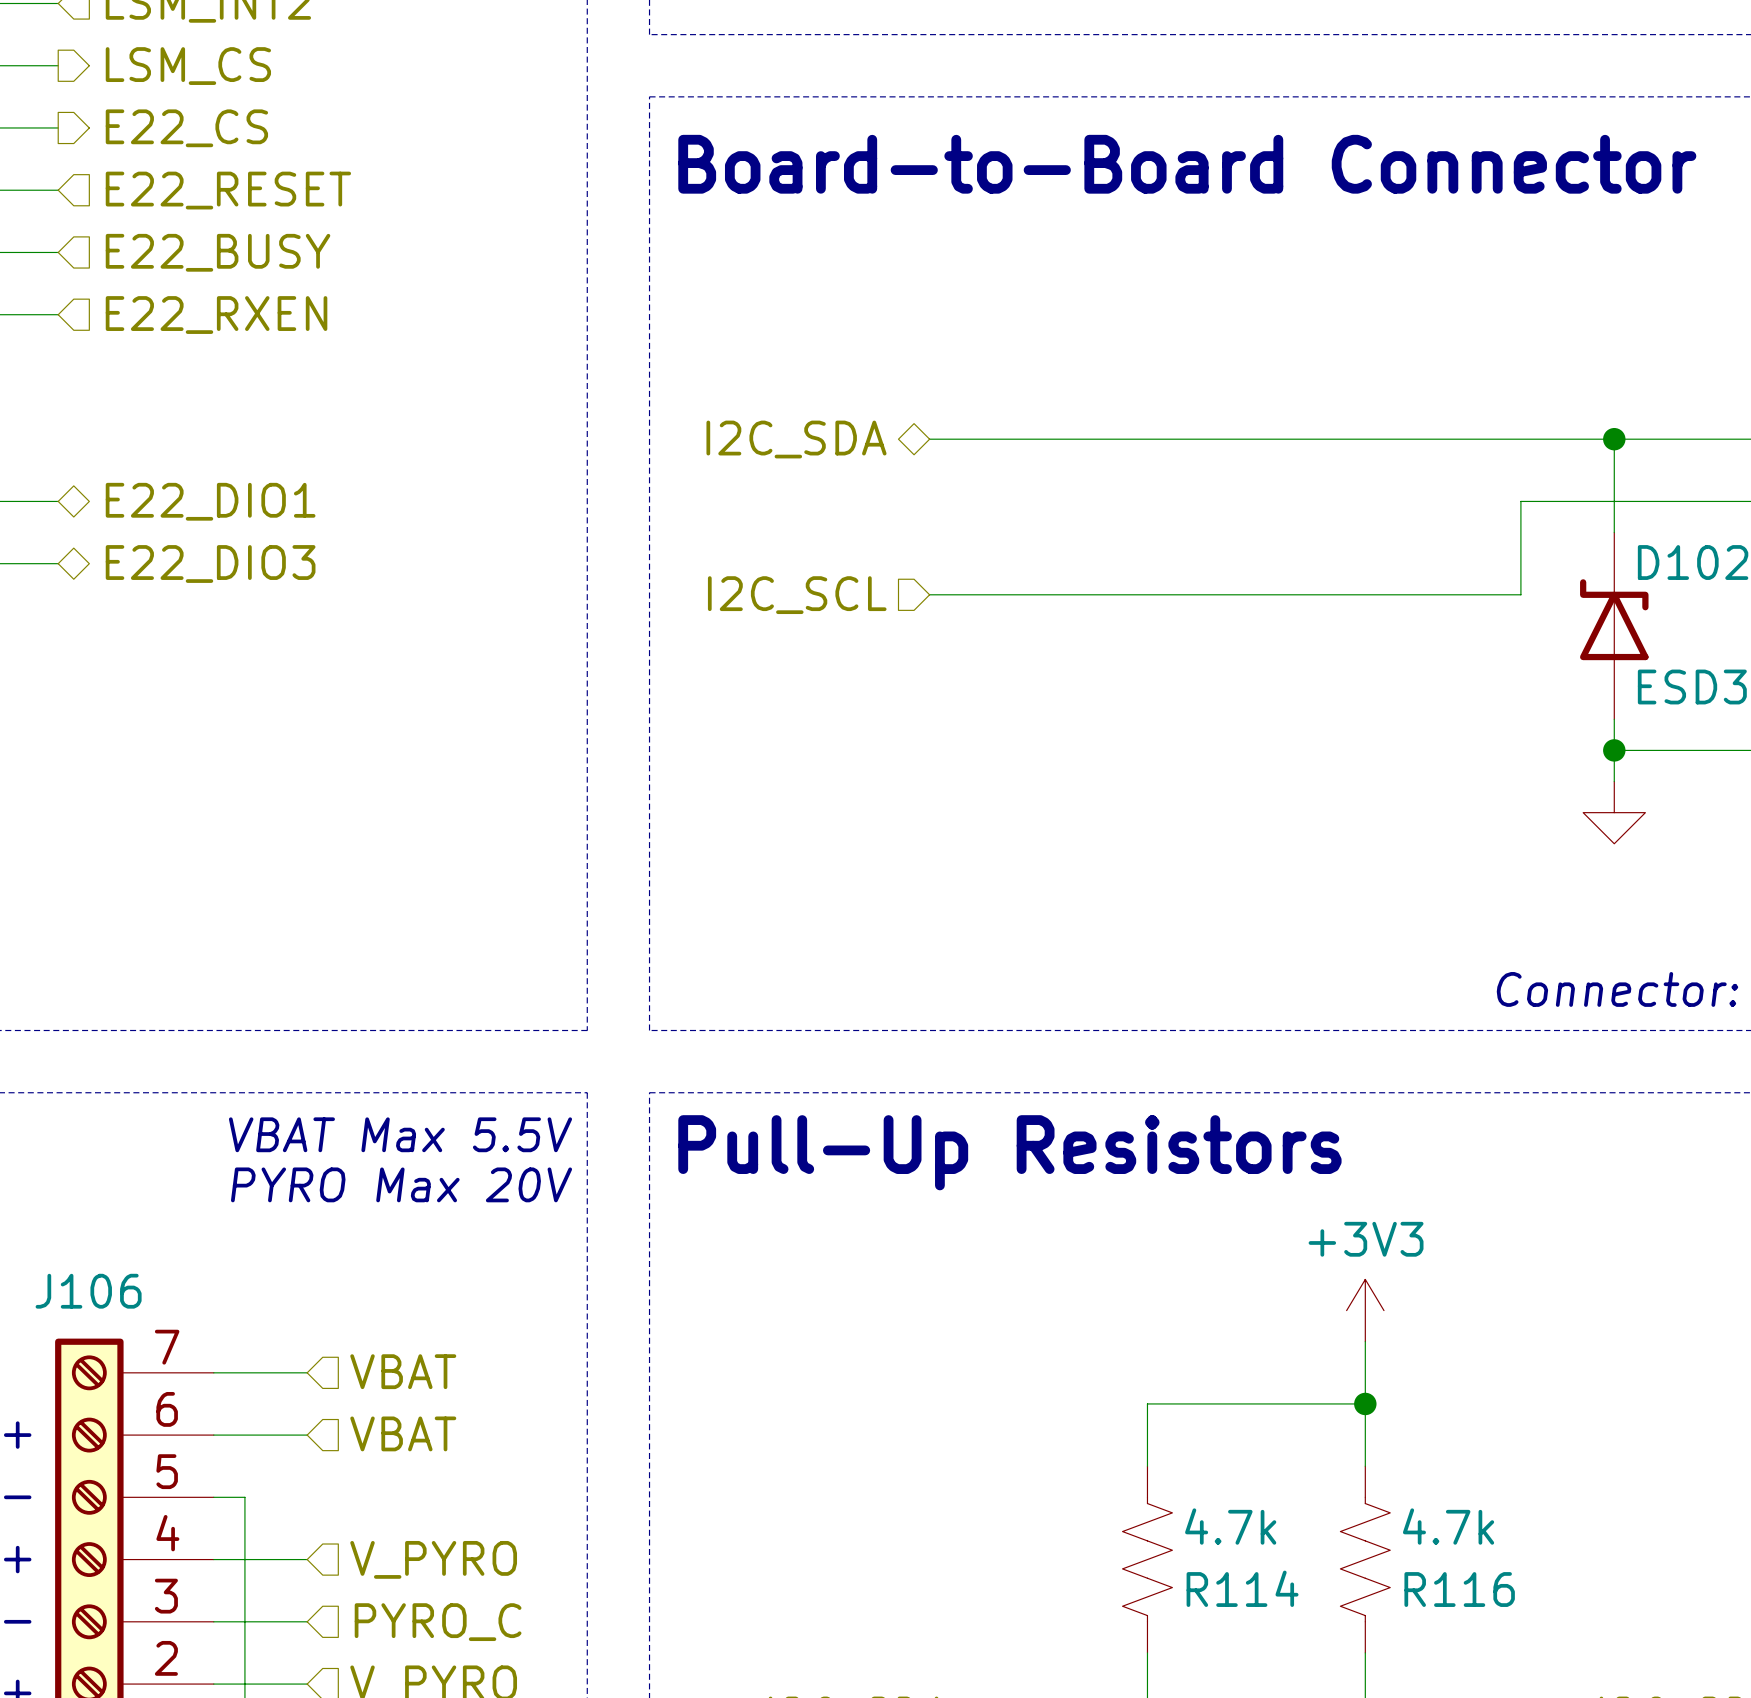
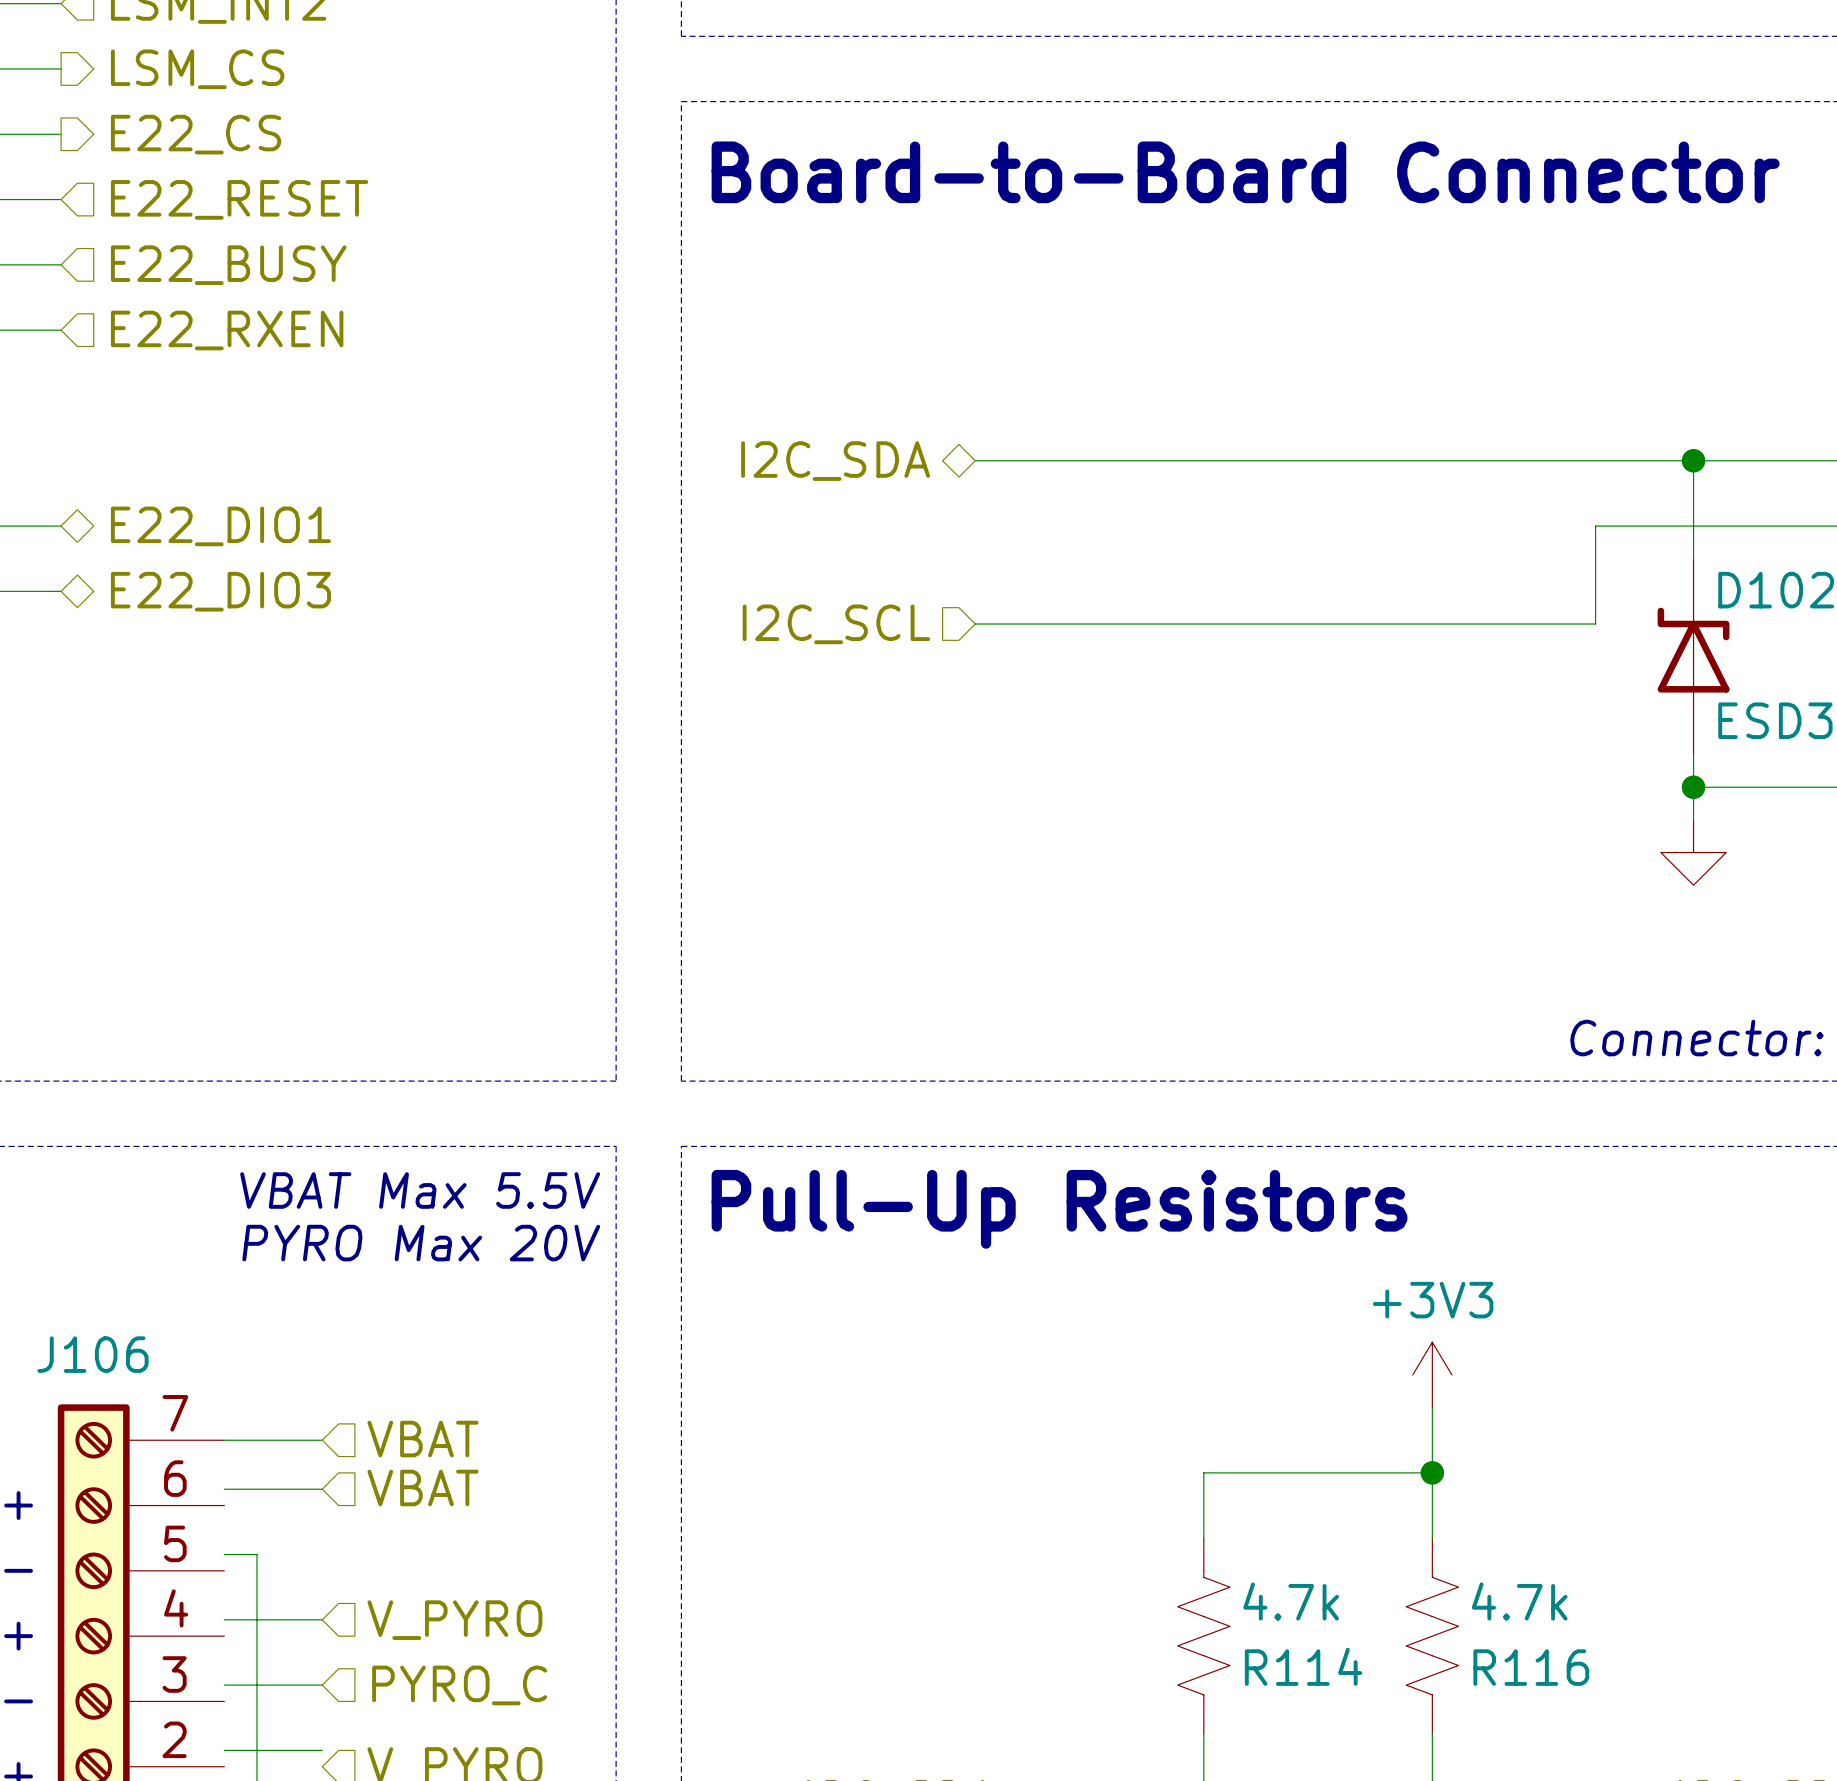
hierarchical label position: VBAT (403, 1433) -> VBAT (423, 1487)
wire: (213, 1435) (307, 1435) -> (224, 1489) (322, 1489)
wire: (213, 1497) (244, 1497) -> (224, 1554) (256, 1554) (256, 1570)
wire: (213, 1559) (307, 1559) -> (224, 1619) (322, 1619)
hierarchical label position: V_PYRO (433, 1559) -> V_PYRO (454, 1620)
wire: (213, 1621) (307, 1621) -> (224, 1685) (322, 1685)
hierarchical label position: PYRO_C (438, 1622) -> PYRO_C (459, 1685)
wire: (213, 1684) (307, 1684) -> (224, 1750) (322, 1750)

